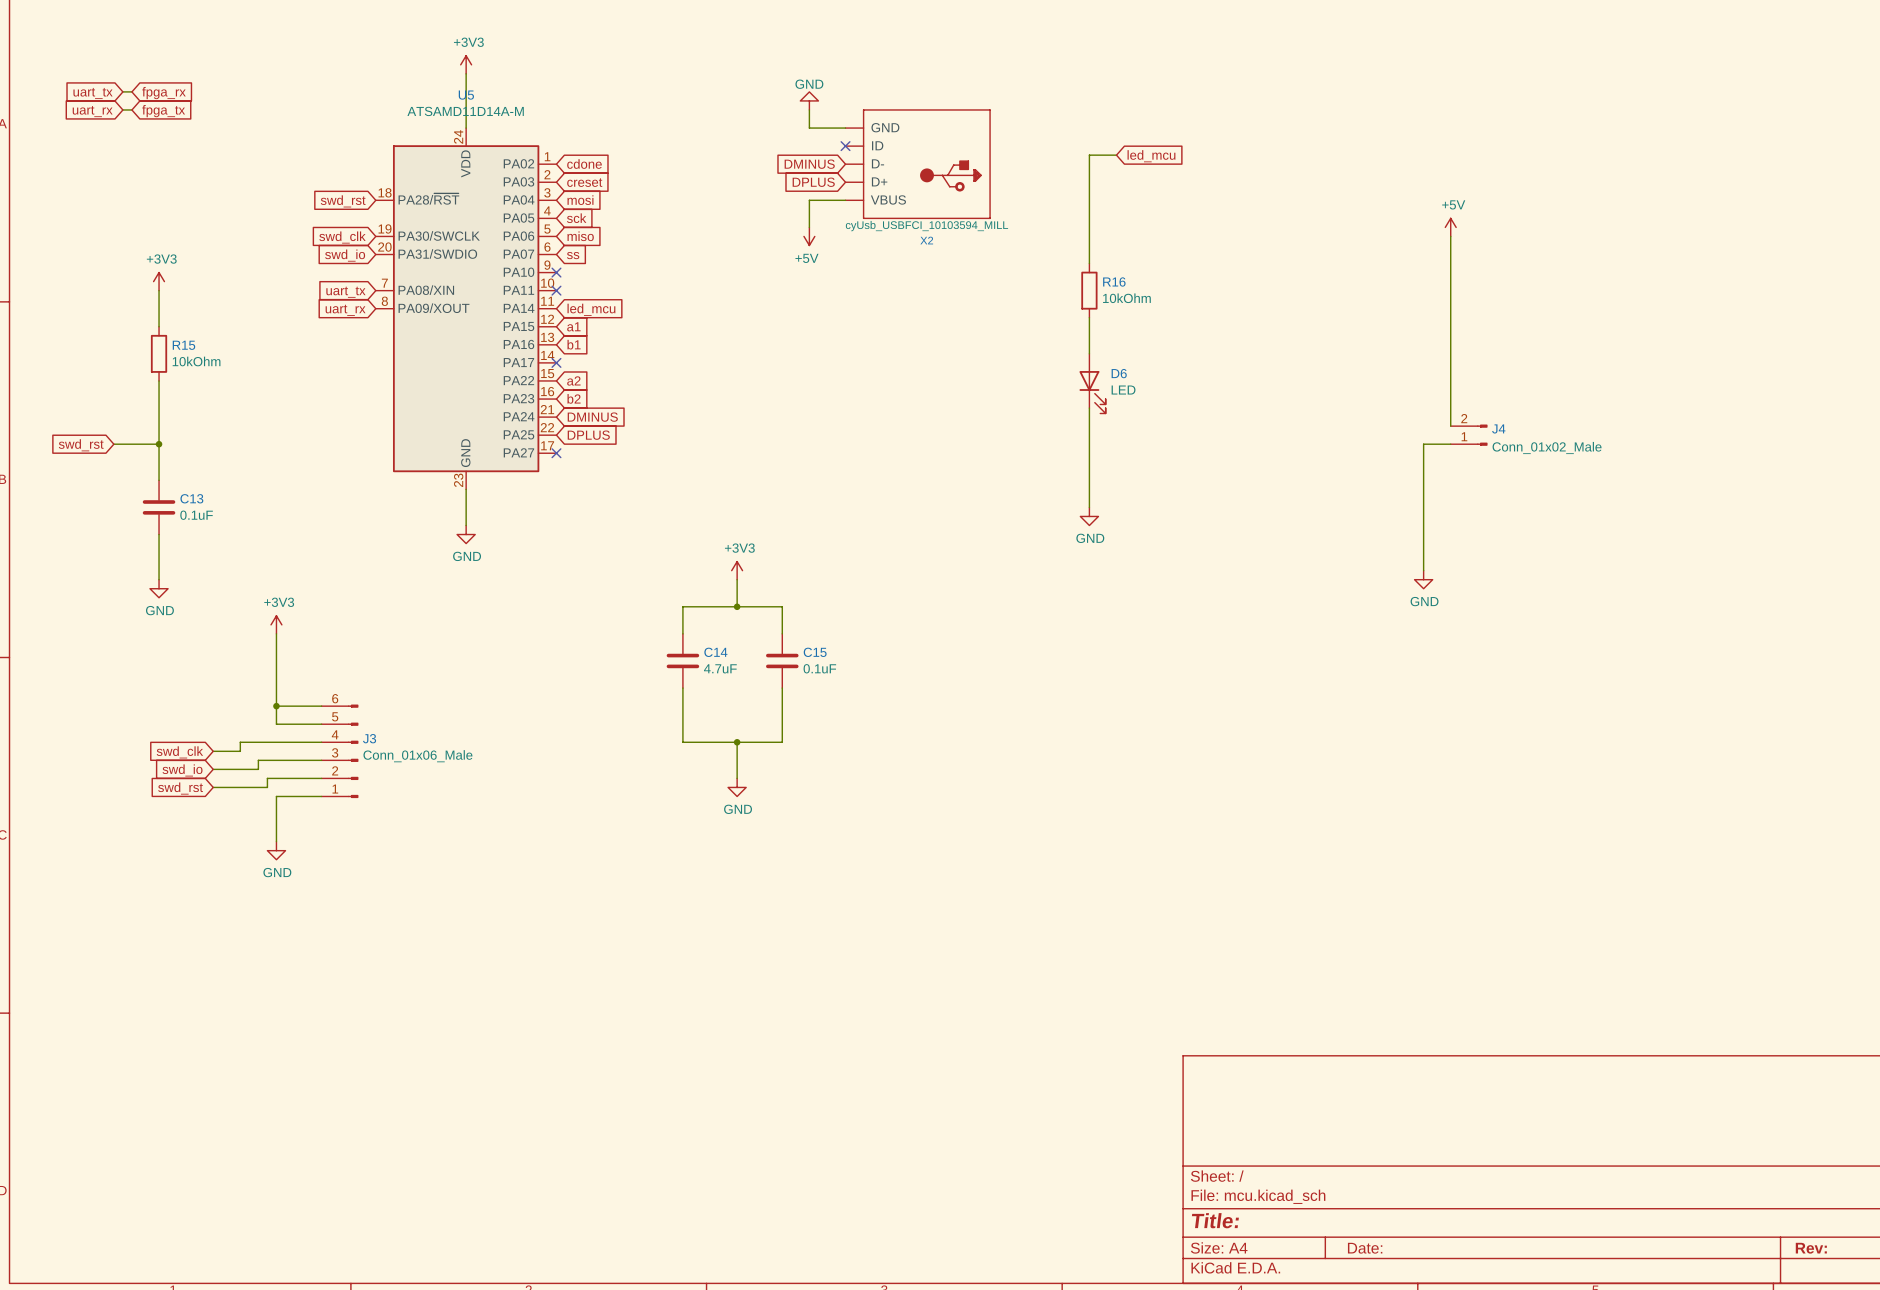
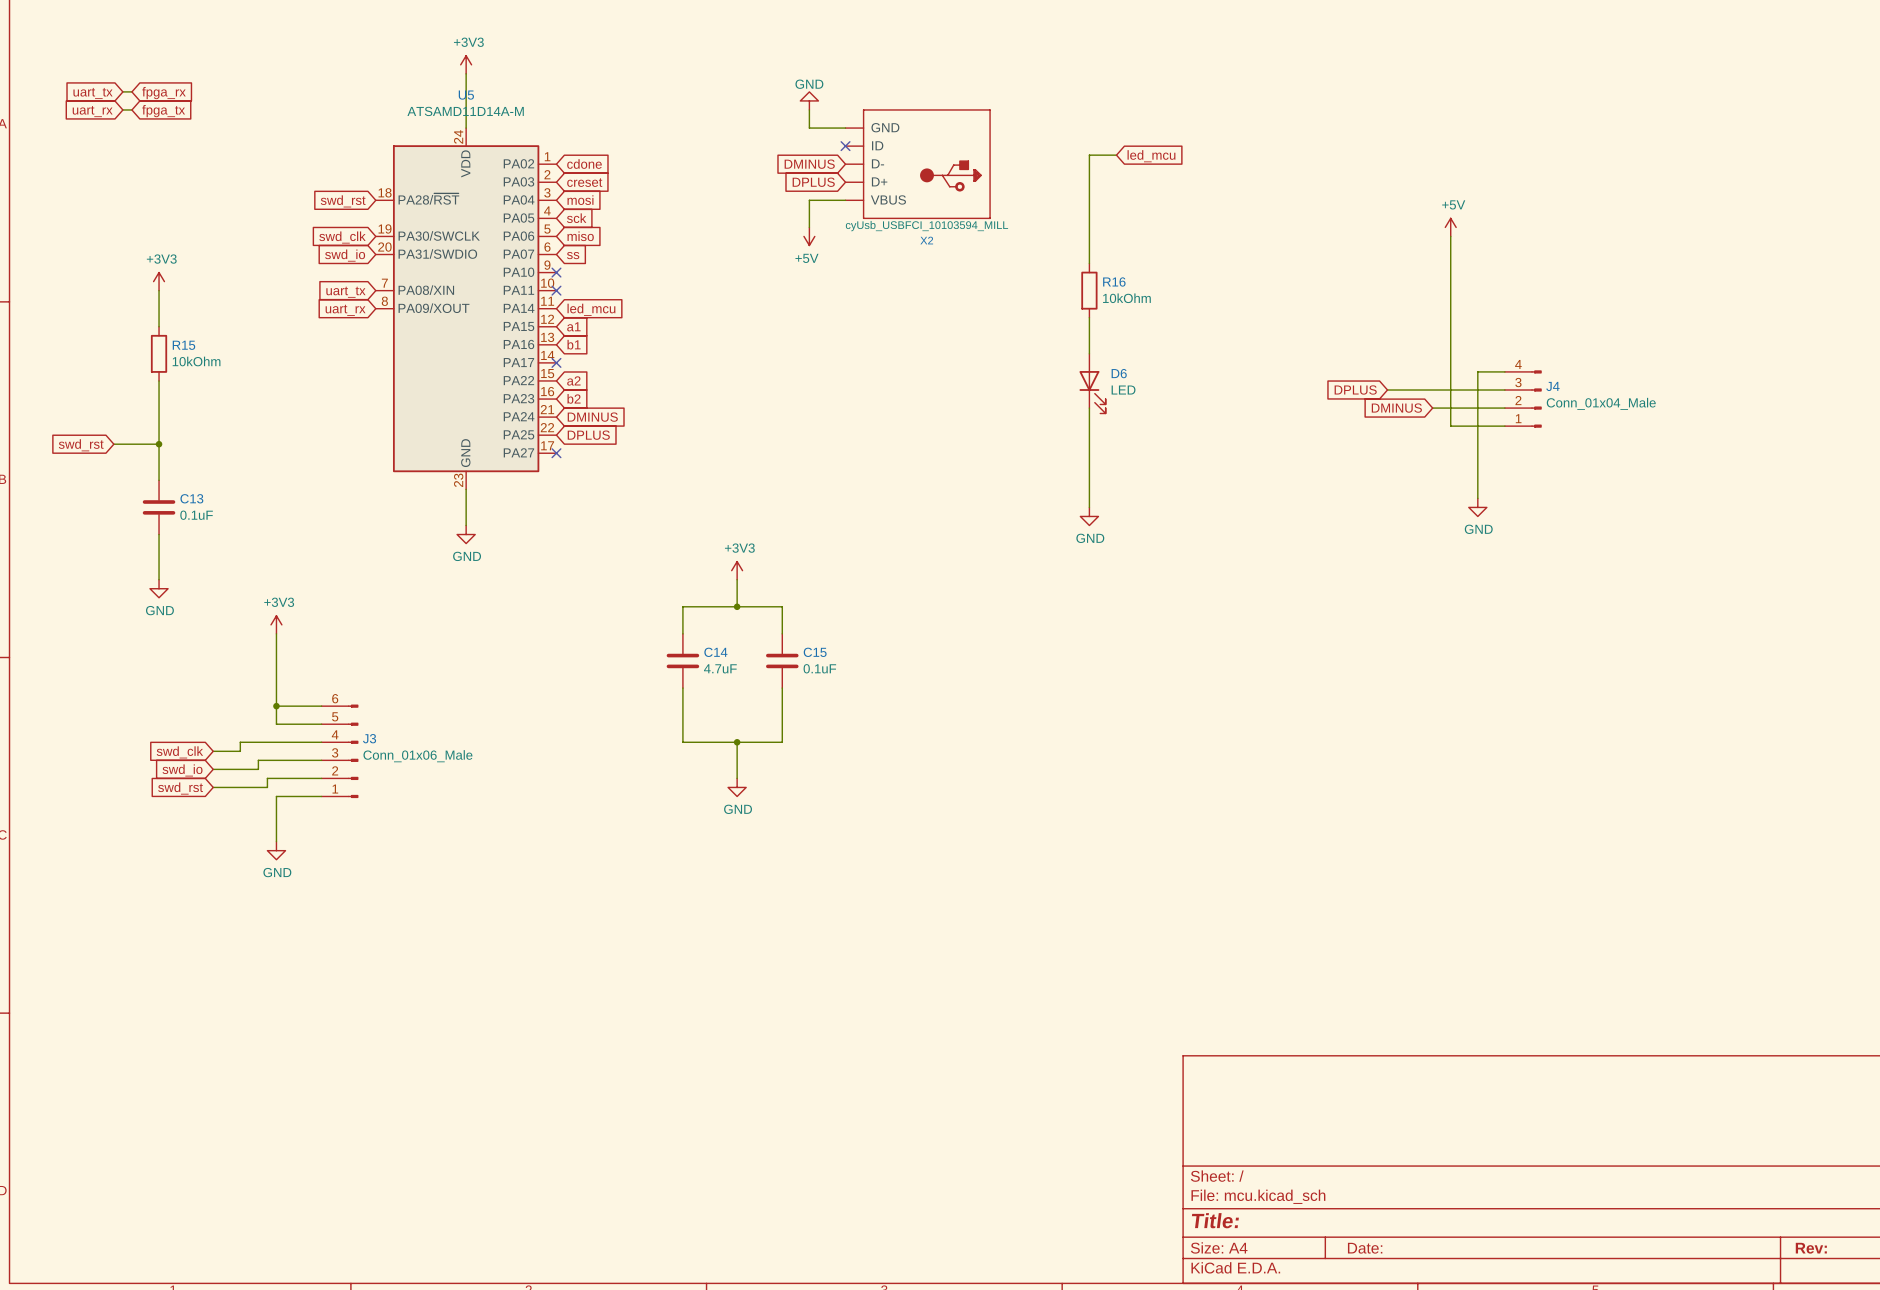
global label: none -> DPLUS (1355, 390)
wire: none -> (1387, 390) (1504, 390)
global label: none -> DMINUS (1396, 408)
wire: none -> (1432, 408) (1504, 408)
J4 symbol: [1450, 424, 1488, 446] -> [1504, 370, 1542, 428]
wire: (1450, 444) (1423, 444) (1423, 570) -> (1504, 371) (1477, 371) (1477, 498)
J4 value: Conn_01x02_Male (1547, 448) -> Conn_01x04_Male (1601, 403)
power symbol position: GND (1423, 579) -> GND (1477, 507)

